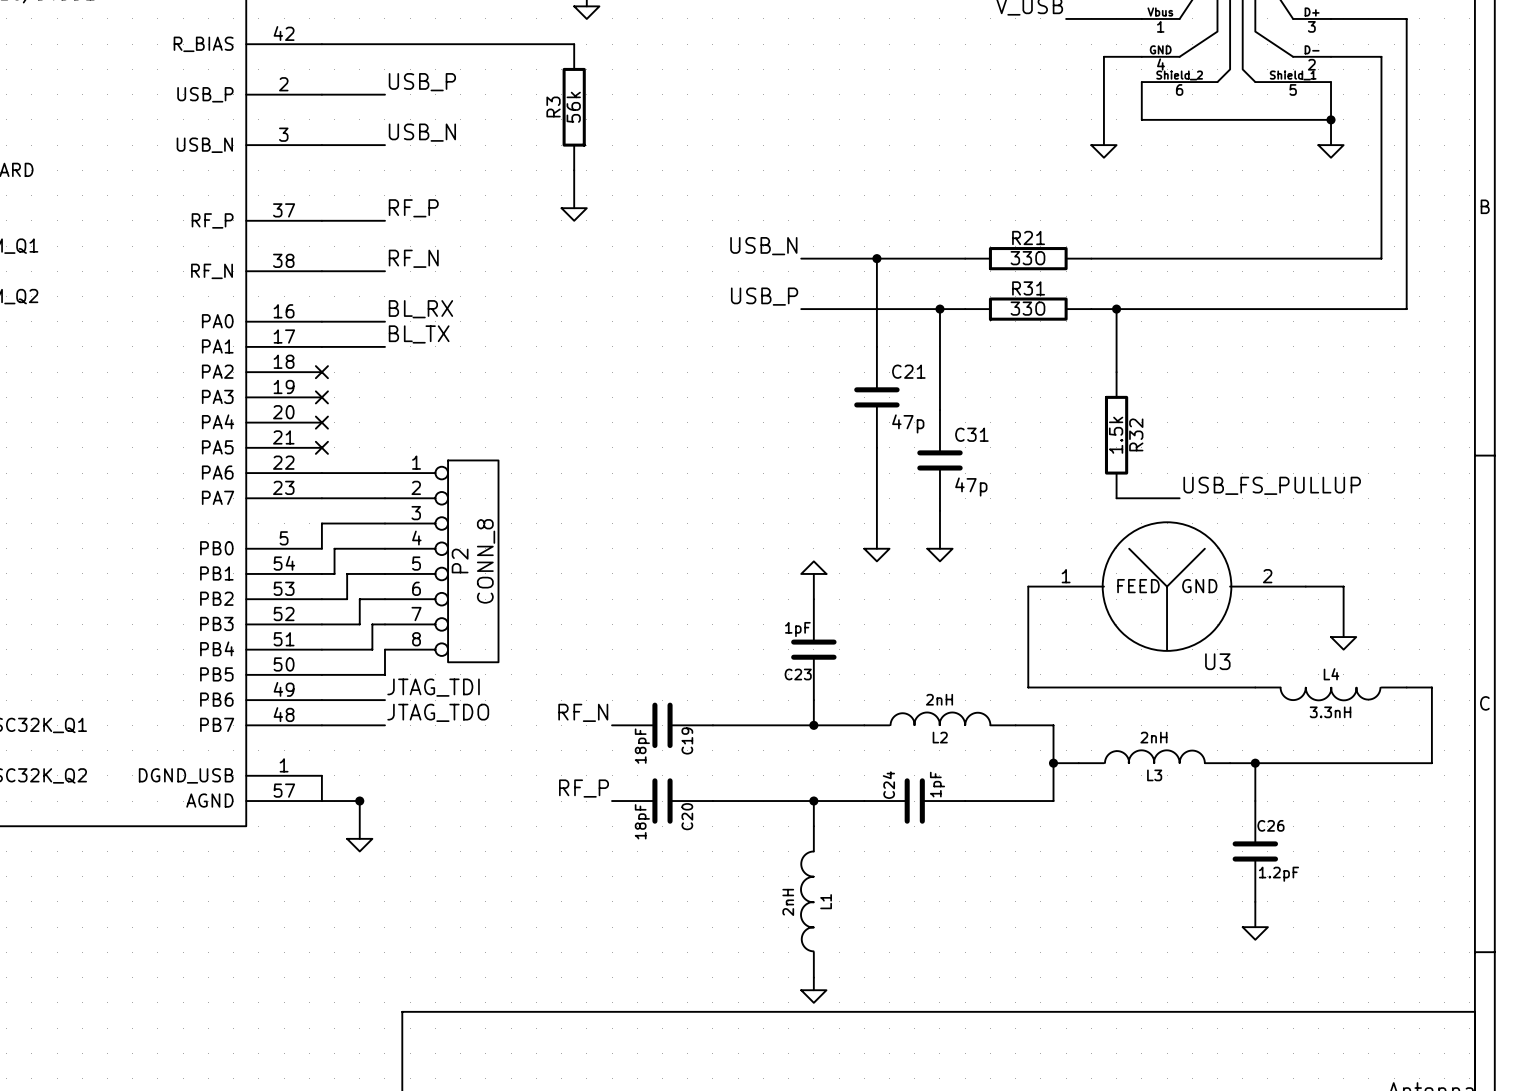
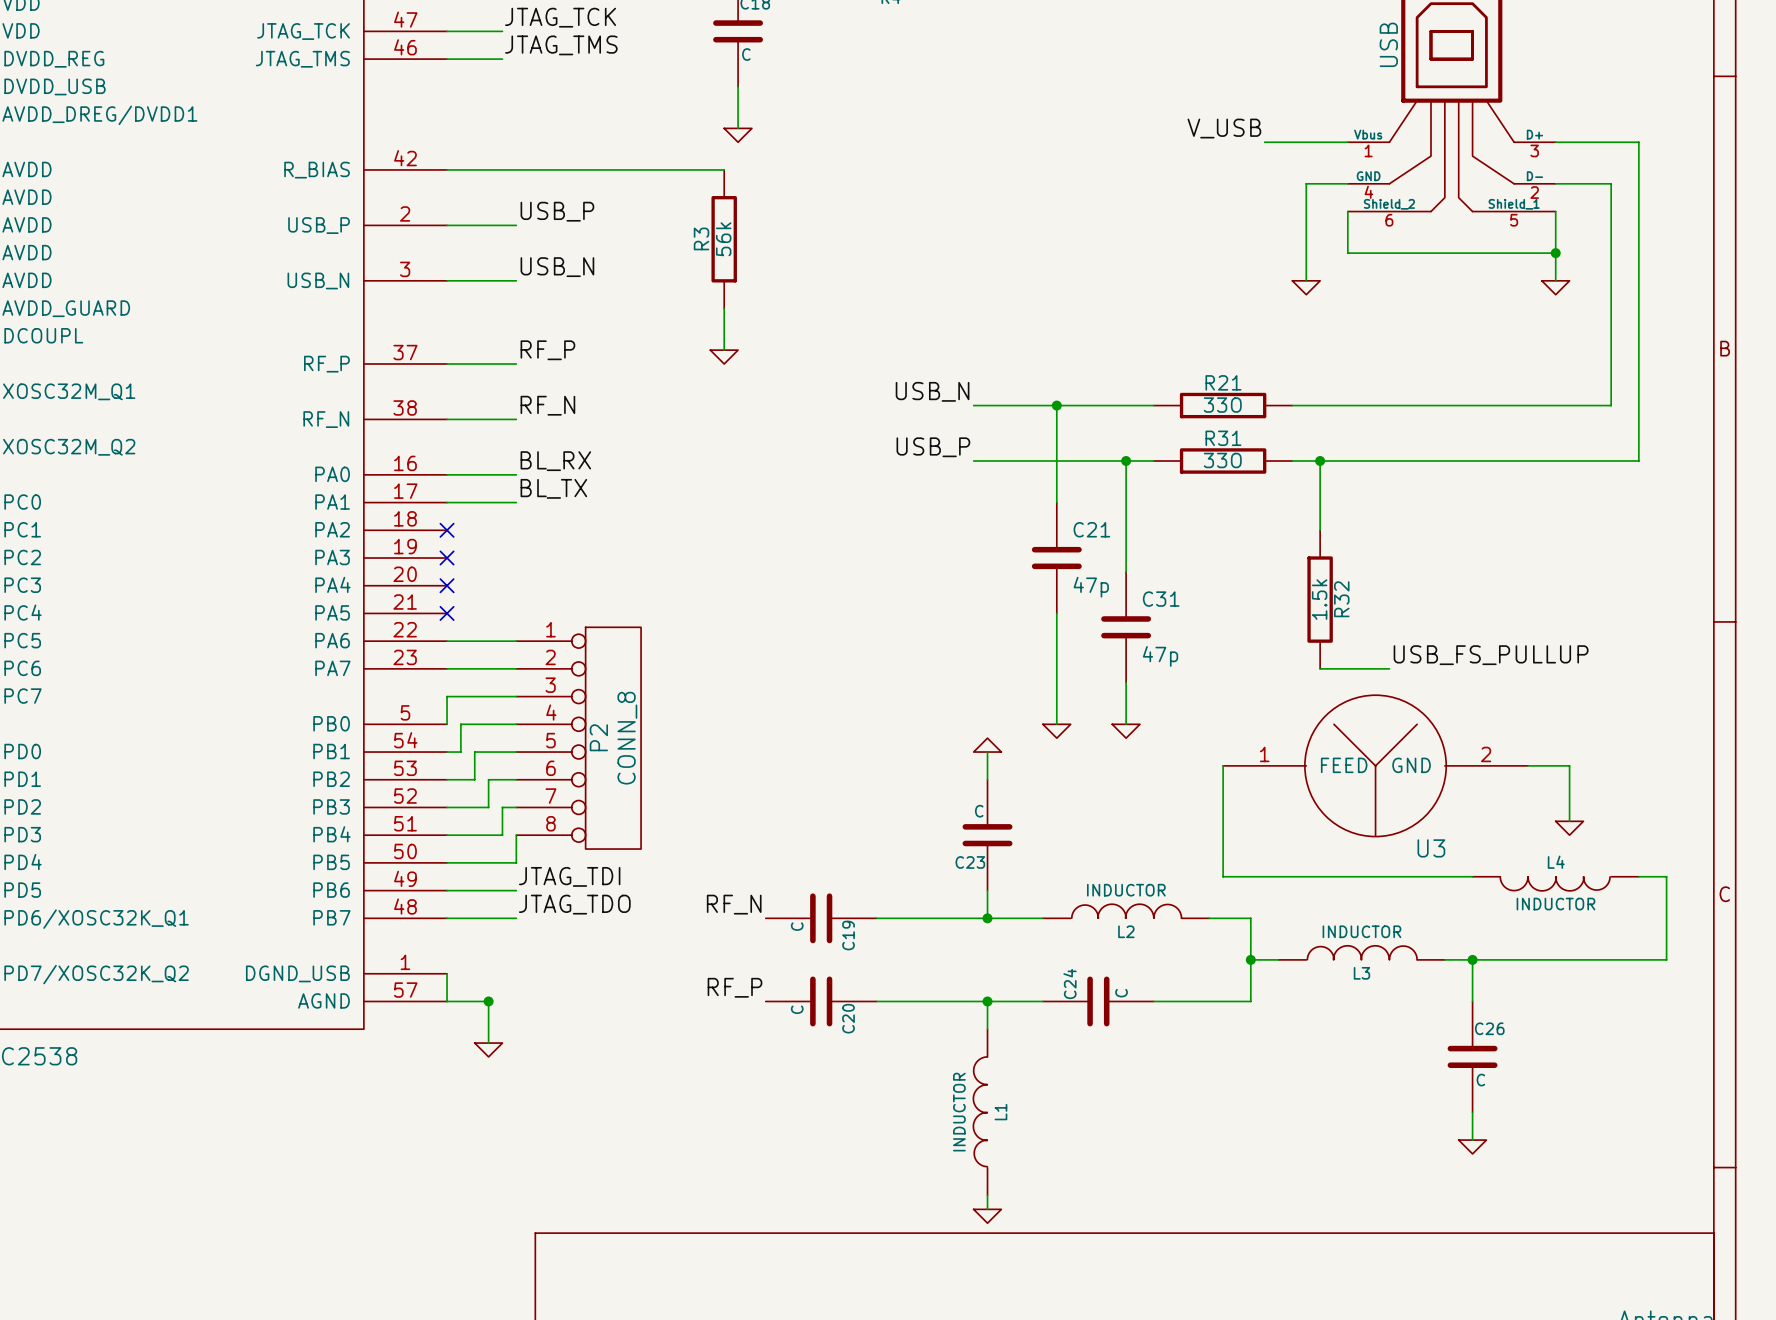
C23 value: 1pF (797, 629) -> C (979, 811)
L2 value: 2nH (939, 699) -> INDUCTOR (1126, 890)
L4 value: 3.3nH (1330, 712) -> INDUCTOR (1555, 904)
L3 value: 2nH (1153, 737) -> INDUCTOR (1361, 931)
C19 value: 18pF (642, 746) -> C (797, 926)
C24 value: 1pF (937, 784) -> C (1121, 993)
C20 value: 18pF (642, 821) -> C (797, 1009)
C26 value: 1.2pF (1278, 874) -> C (1480, 1080)
L1 value: 2nH (788, 902) -> INDUCTOR (959, 1112)

